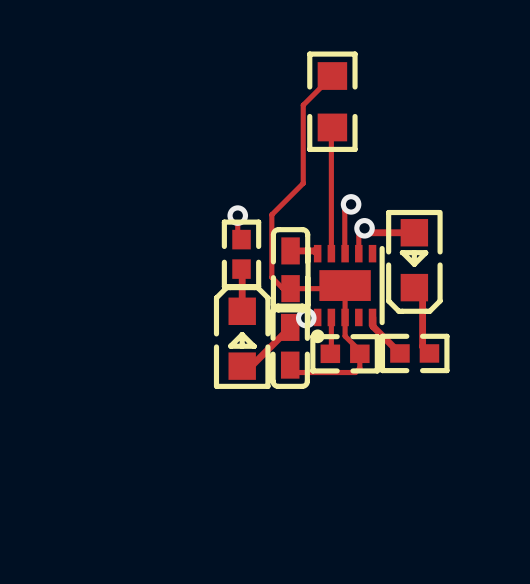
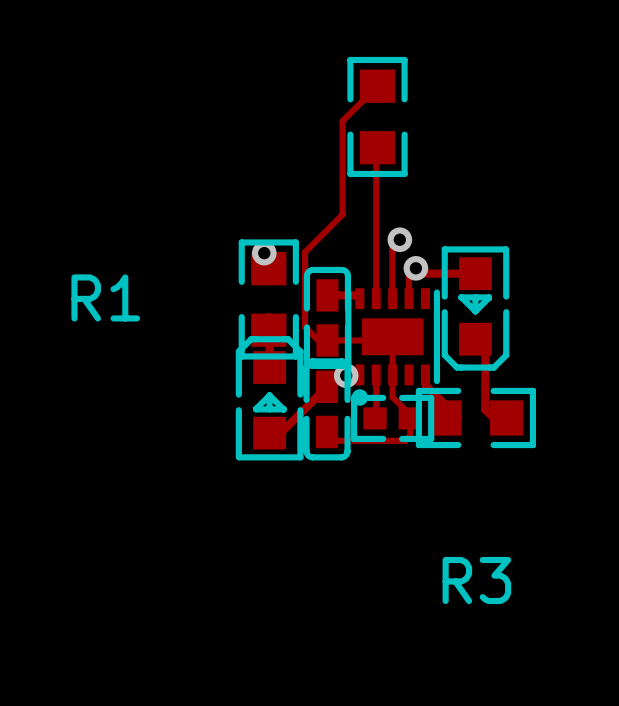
part: (241, 254) -> none
R1: none -> (268, 299)
part: (414, 353) -> none
R3: none -> (475, 417)

